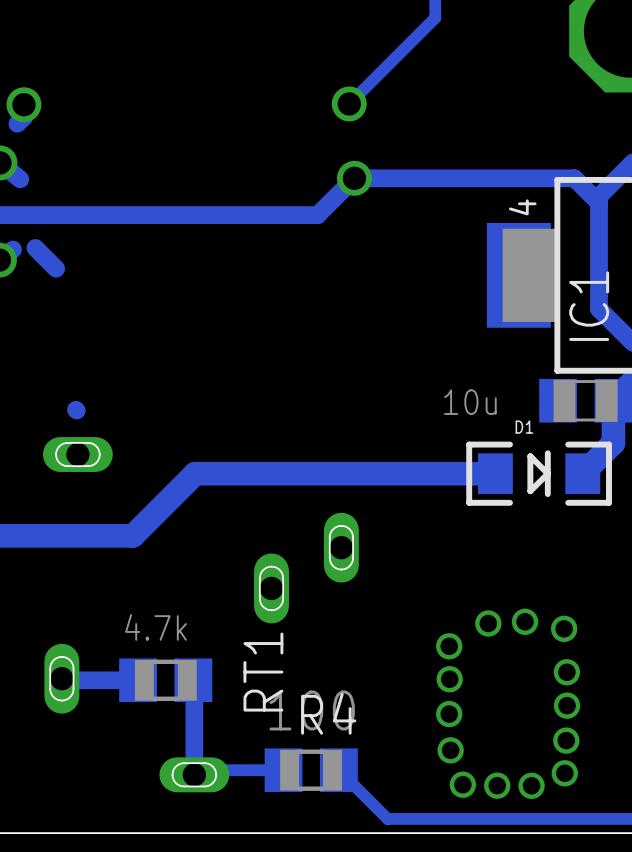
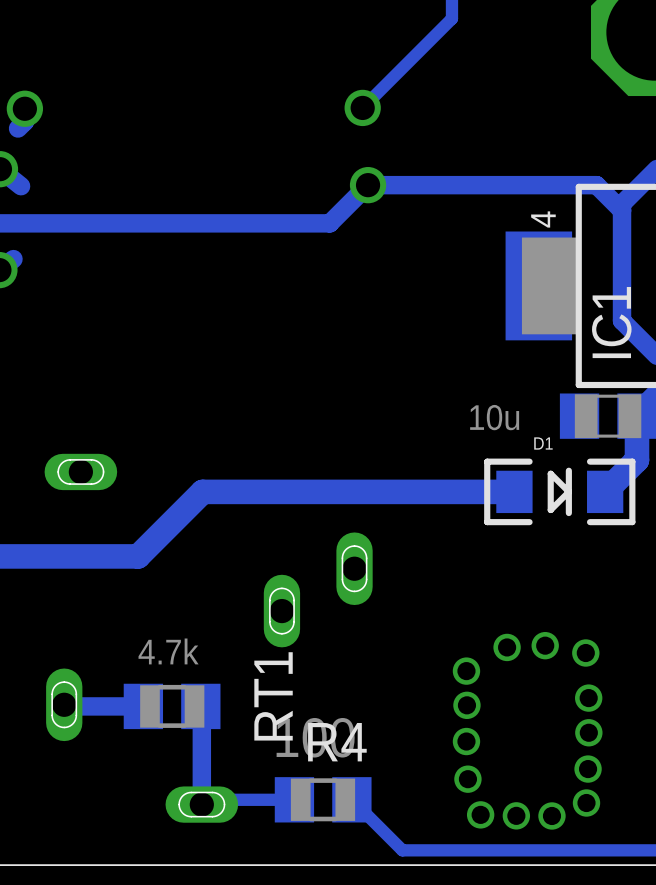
track: (35, 247) (56, 268) -> none
track: (75, 409) (76, 410) -> none

